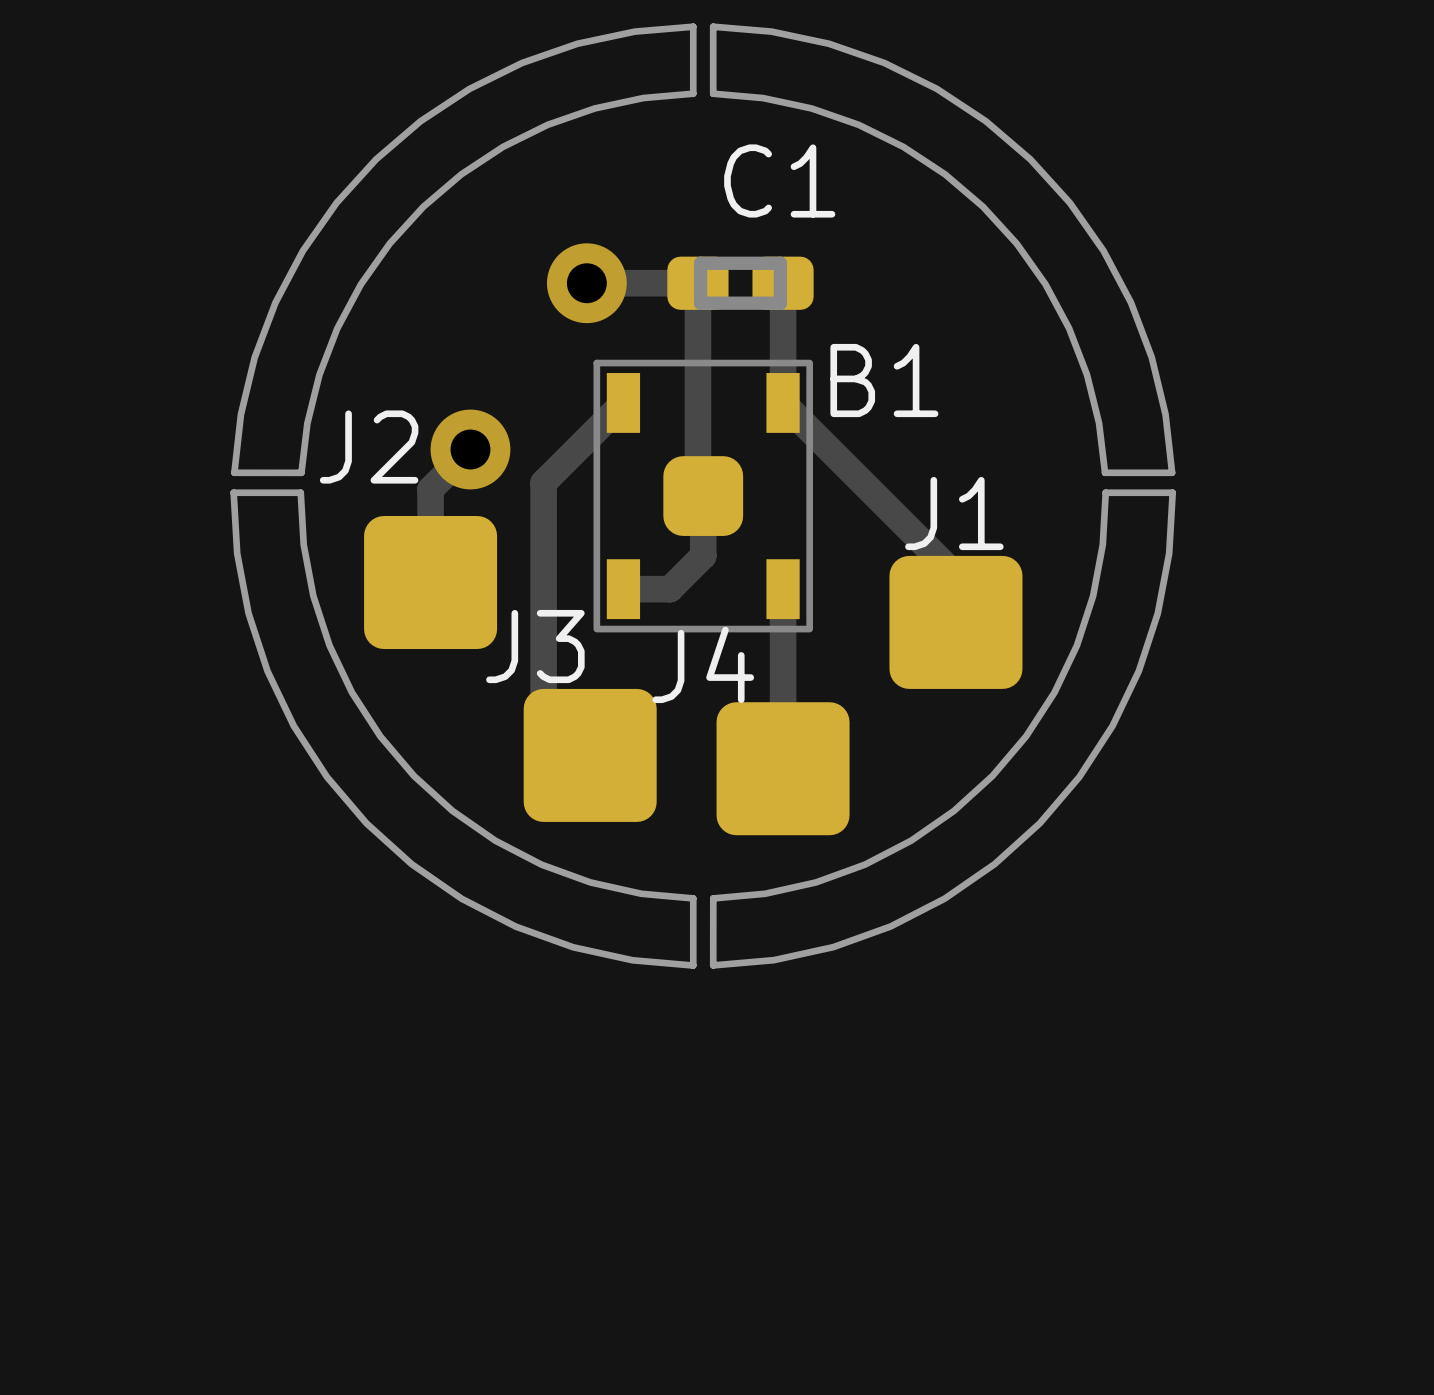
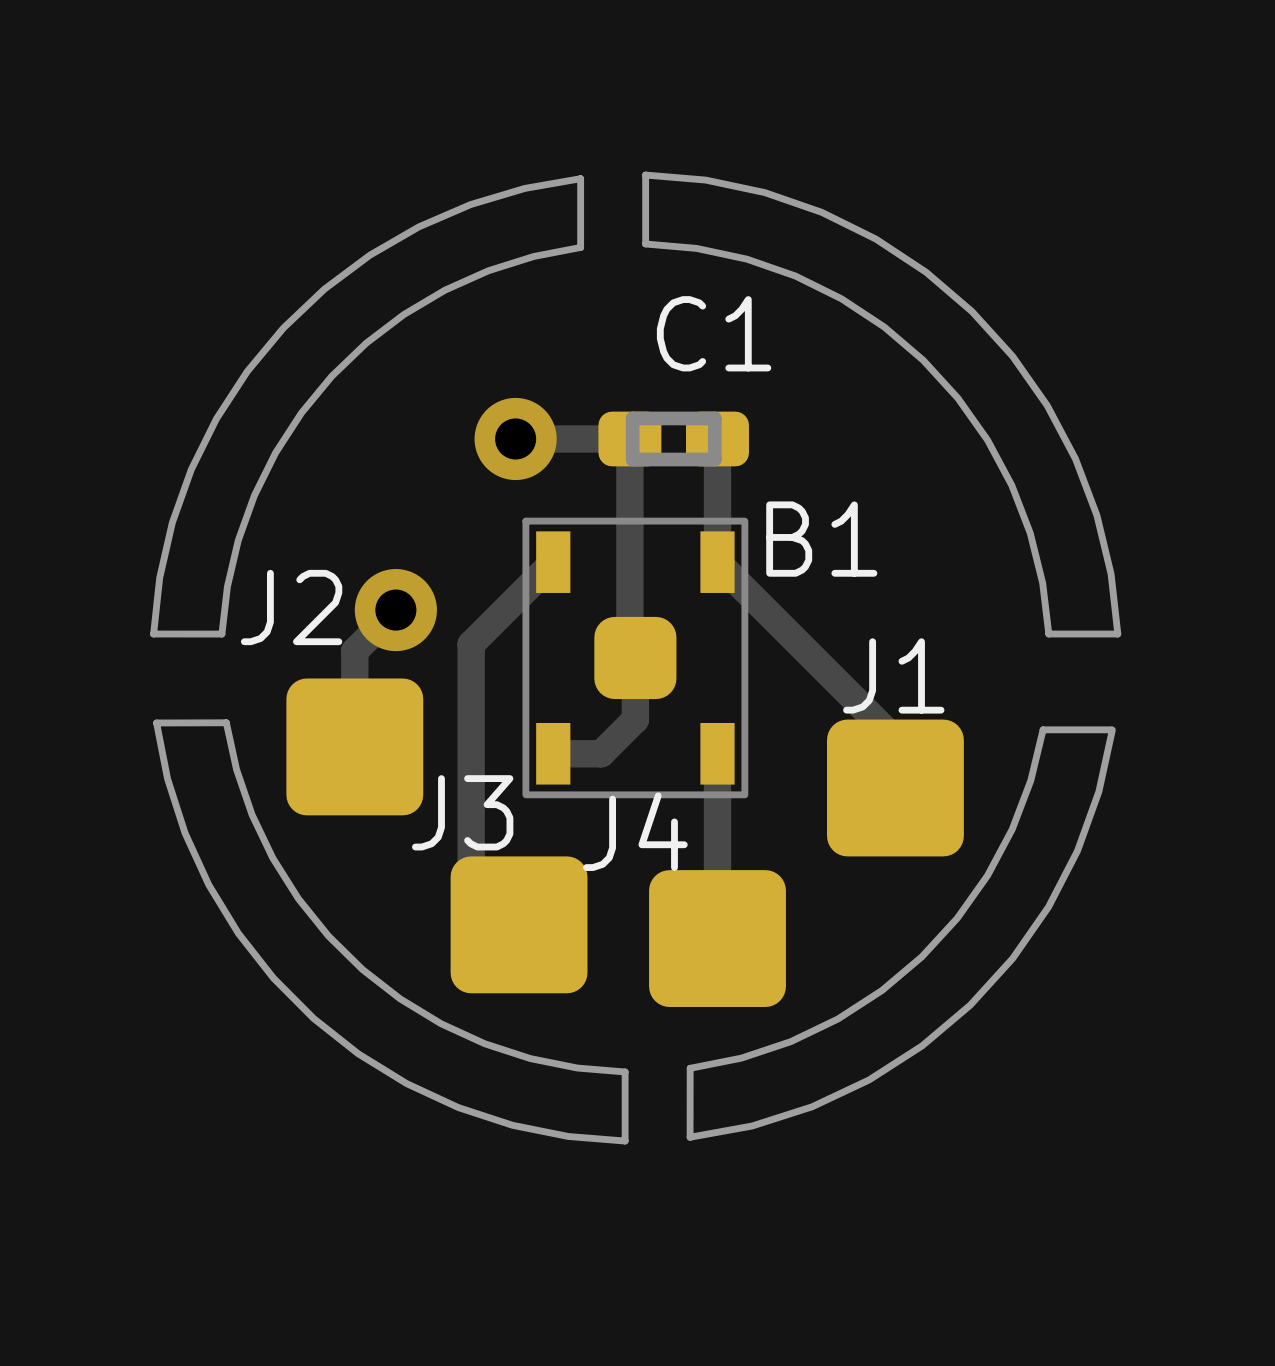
board edge: (234, 472) (240, 414) (254, 357) (275, 302) (302, 250) (336, 202) (376, 159) (420, 121) (469, 88) (522, 62) (577, 43) (634, 31) (693, 26) (693, 93) (643, 98) (594, 108) (547, 124) (502, 146) (461, 174) (423, 206) (389, 243) (360, 284) (337, 328) (319, 374) (307, 423) (301, 472) -> (153, 634) (159, 577) (172, 522) (191, 469) (216, 418) (247, 371) (283, 327) (324, 289) (369, 255) (418, 226) (470, 204) (524, 188) (580, 178) (580, 247) (533, 256) (488, 270) (444, 290) (404, 314) (366, 343) (331, 376) (301, 412) (275, 452) (254, 495) (238, 540) (227, 586) (221, 634)
board edge: (693, 898) (641, 893) (590, 882) (541, 864) (495, 840) (452, 810) (413, 775) (380, 736) (351, 692) (329, 645) (313, 595) (303, 544) (300, 492) (233, 492) (237, 553) (248, 613) (267, 671) (293, 726) (327, 777) (366, 823) (411, 864) (461, 898) (515, 926) (573, 947) (632, 960) (693, 965) -> (625, 1071) (577, 1068) (530, 1058) (484, 1043) (441, 1023) (400, 998) (362, 969) (328, 935) (298, 898) (272, 858) (252, 814) (236, 769) (226, 722) (156, 722) (167, 778) (185, 833) (208, 884) (238, 933) (273, 978) (313, 1018) (358, 1053) (406, 1083) (458, 1107) (512, 1125) (568, 1136) (625, 1141)
board edge: (713, 898) (713, 965) (773, 960) (833, 947) (890, 926) (944, 898) (994, 864) (1039, 823) (1079, 776) (1112, 725) (1138, 671) (1157, 613) (1169, 553) (1172, 492) (1105, 492) (1102, 544) (1093, 595) (1076, 645) (1054, 692) (1026, 736) (992, 775) (953, 810) (911, 840) (864, 864) (816, 882) (765, 893) (713, 898) -> (1111, 729) (1043, 729) (1030, 780) (1012, 829) (987, 875) (957, 918) (921, 956) (882, 990) (838, 1018) (791, 1041) (741, 1058) (690, 1068) (690, 1137) (752, 1126) (812, 1106) (869, 1079) (922, 1045) (970, 1005) (1012, 958) (1048, 906) (1077, 850) (1098, 791) (1112, 729)

